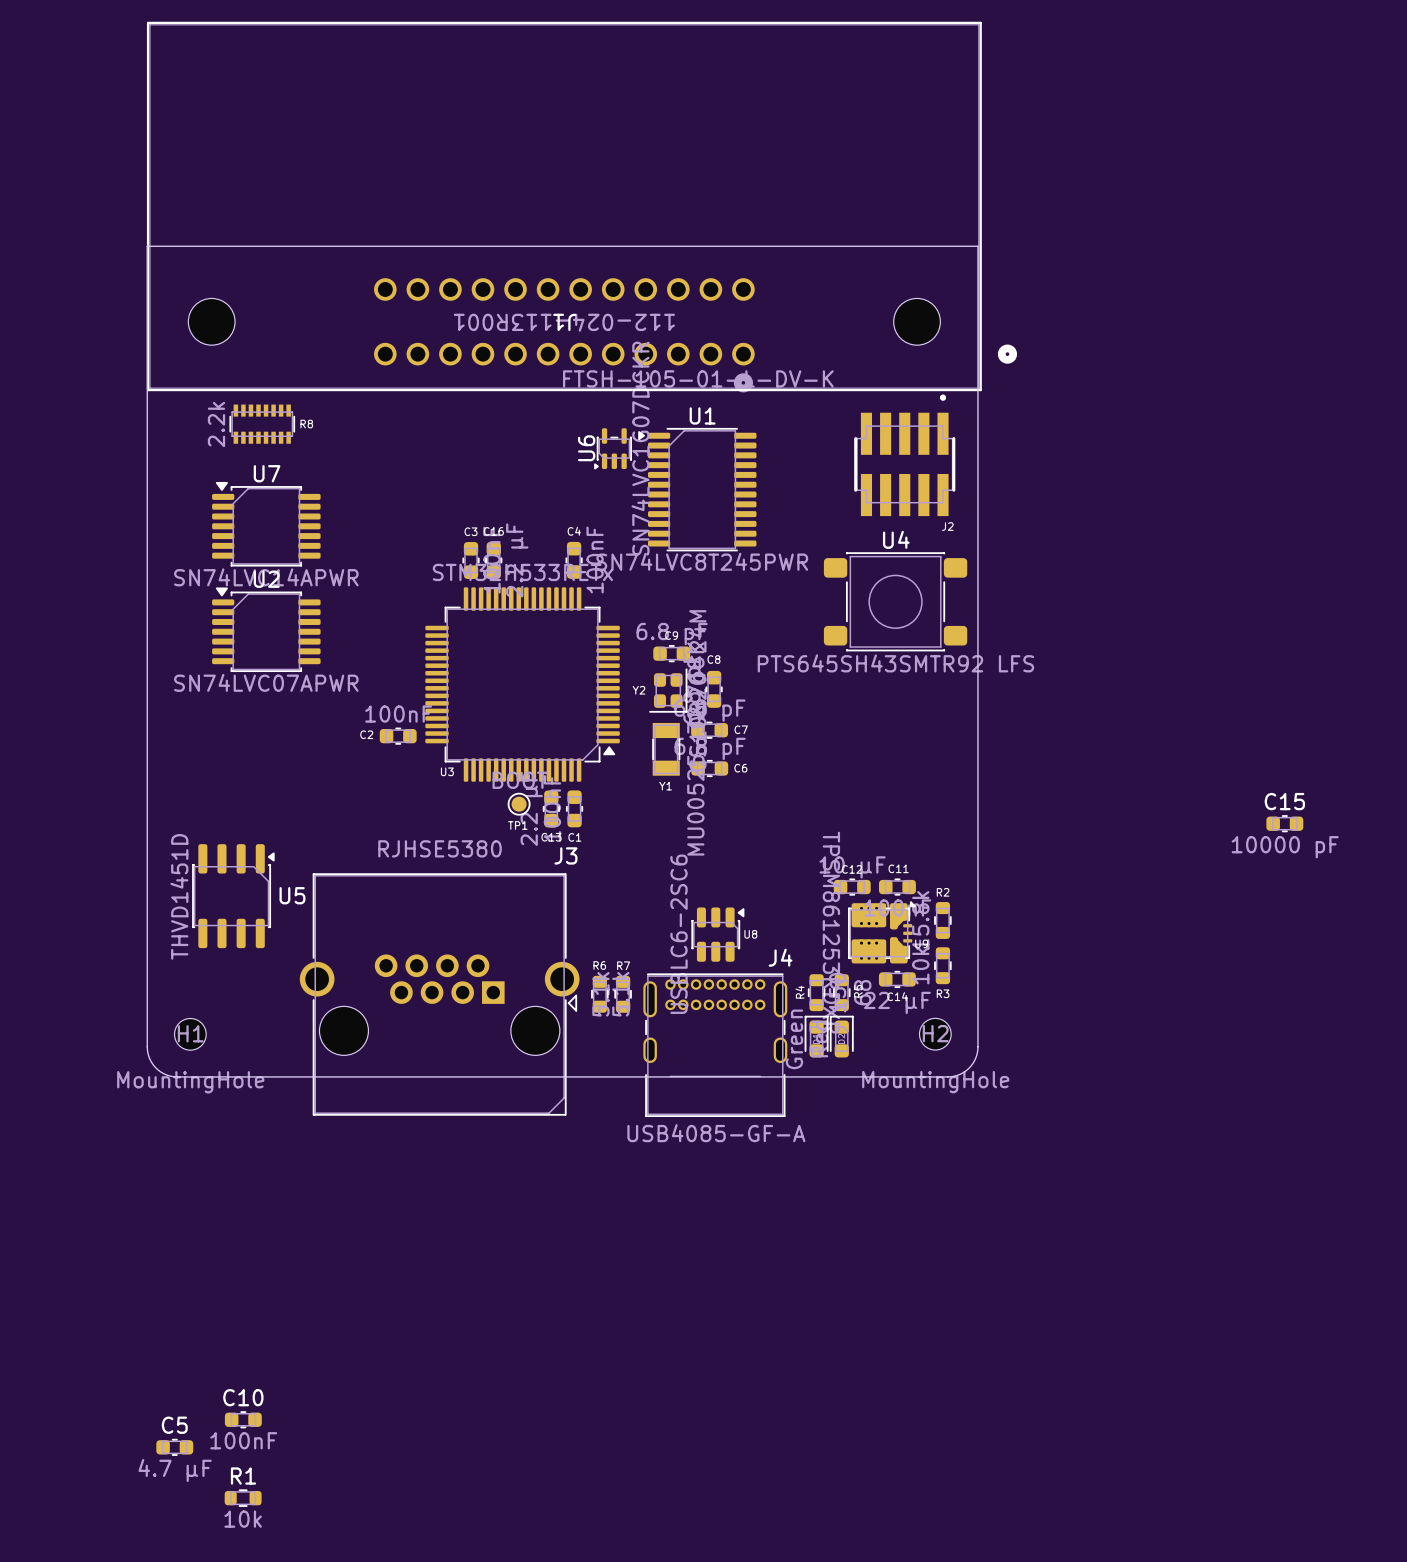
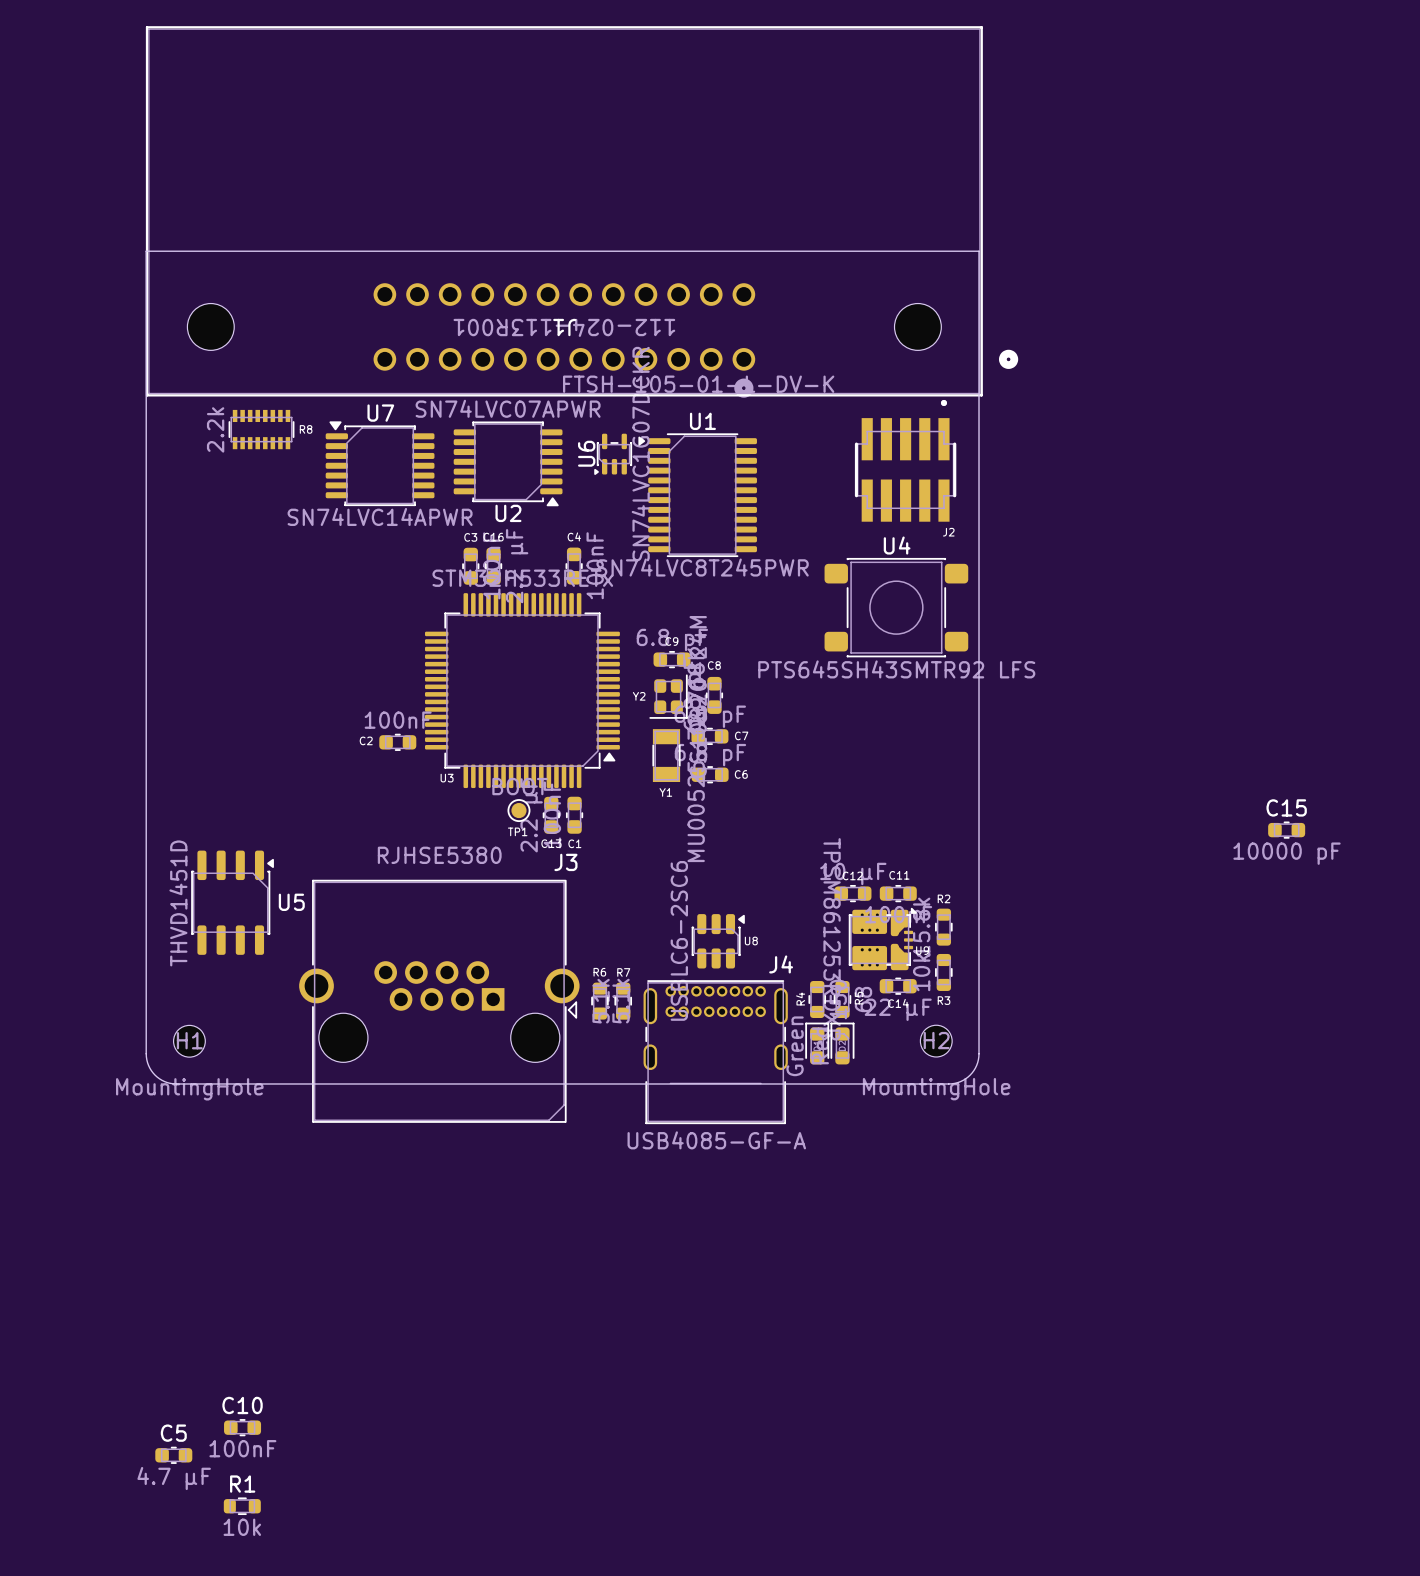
U7 position: (266, 524) -> (380, 463)
U2 rotation: 0° (266, 629) -> 180° (508, 463)
U2 position: (266, 629) -> (508, 463)

